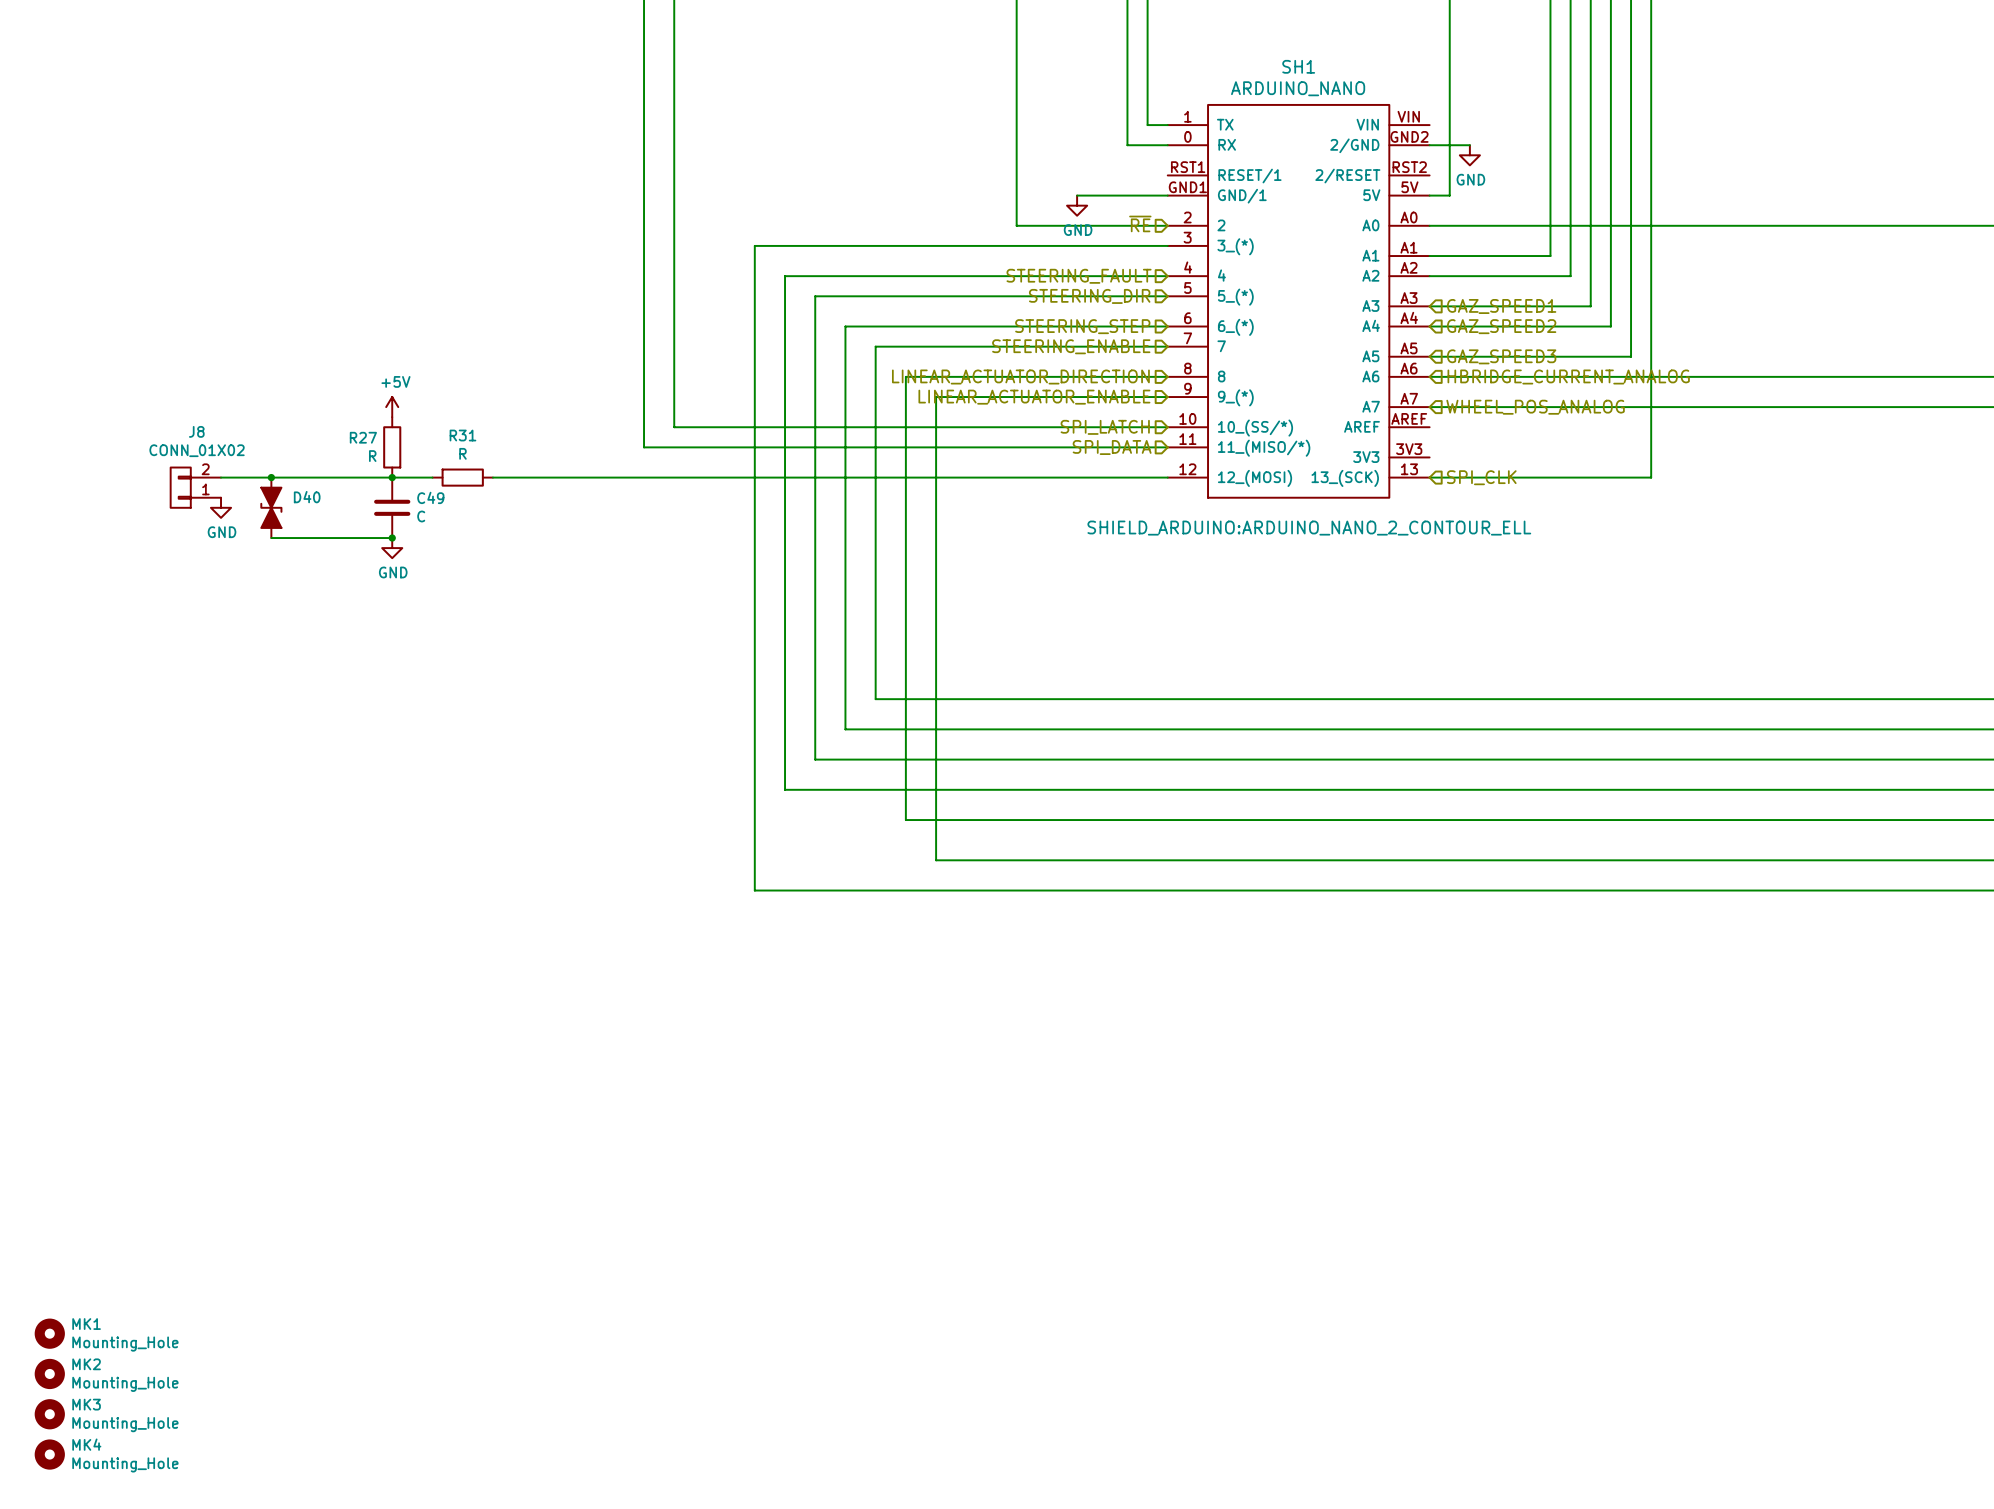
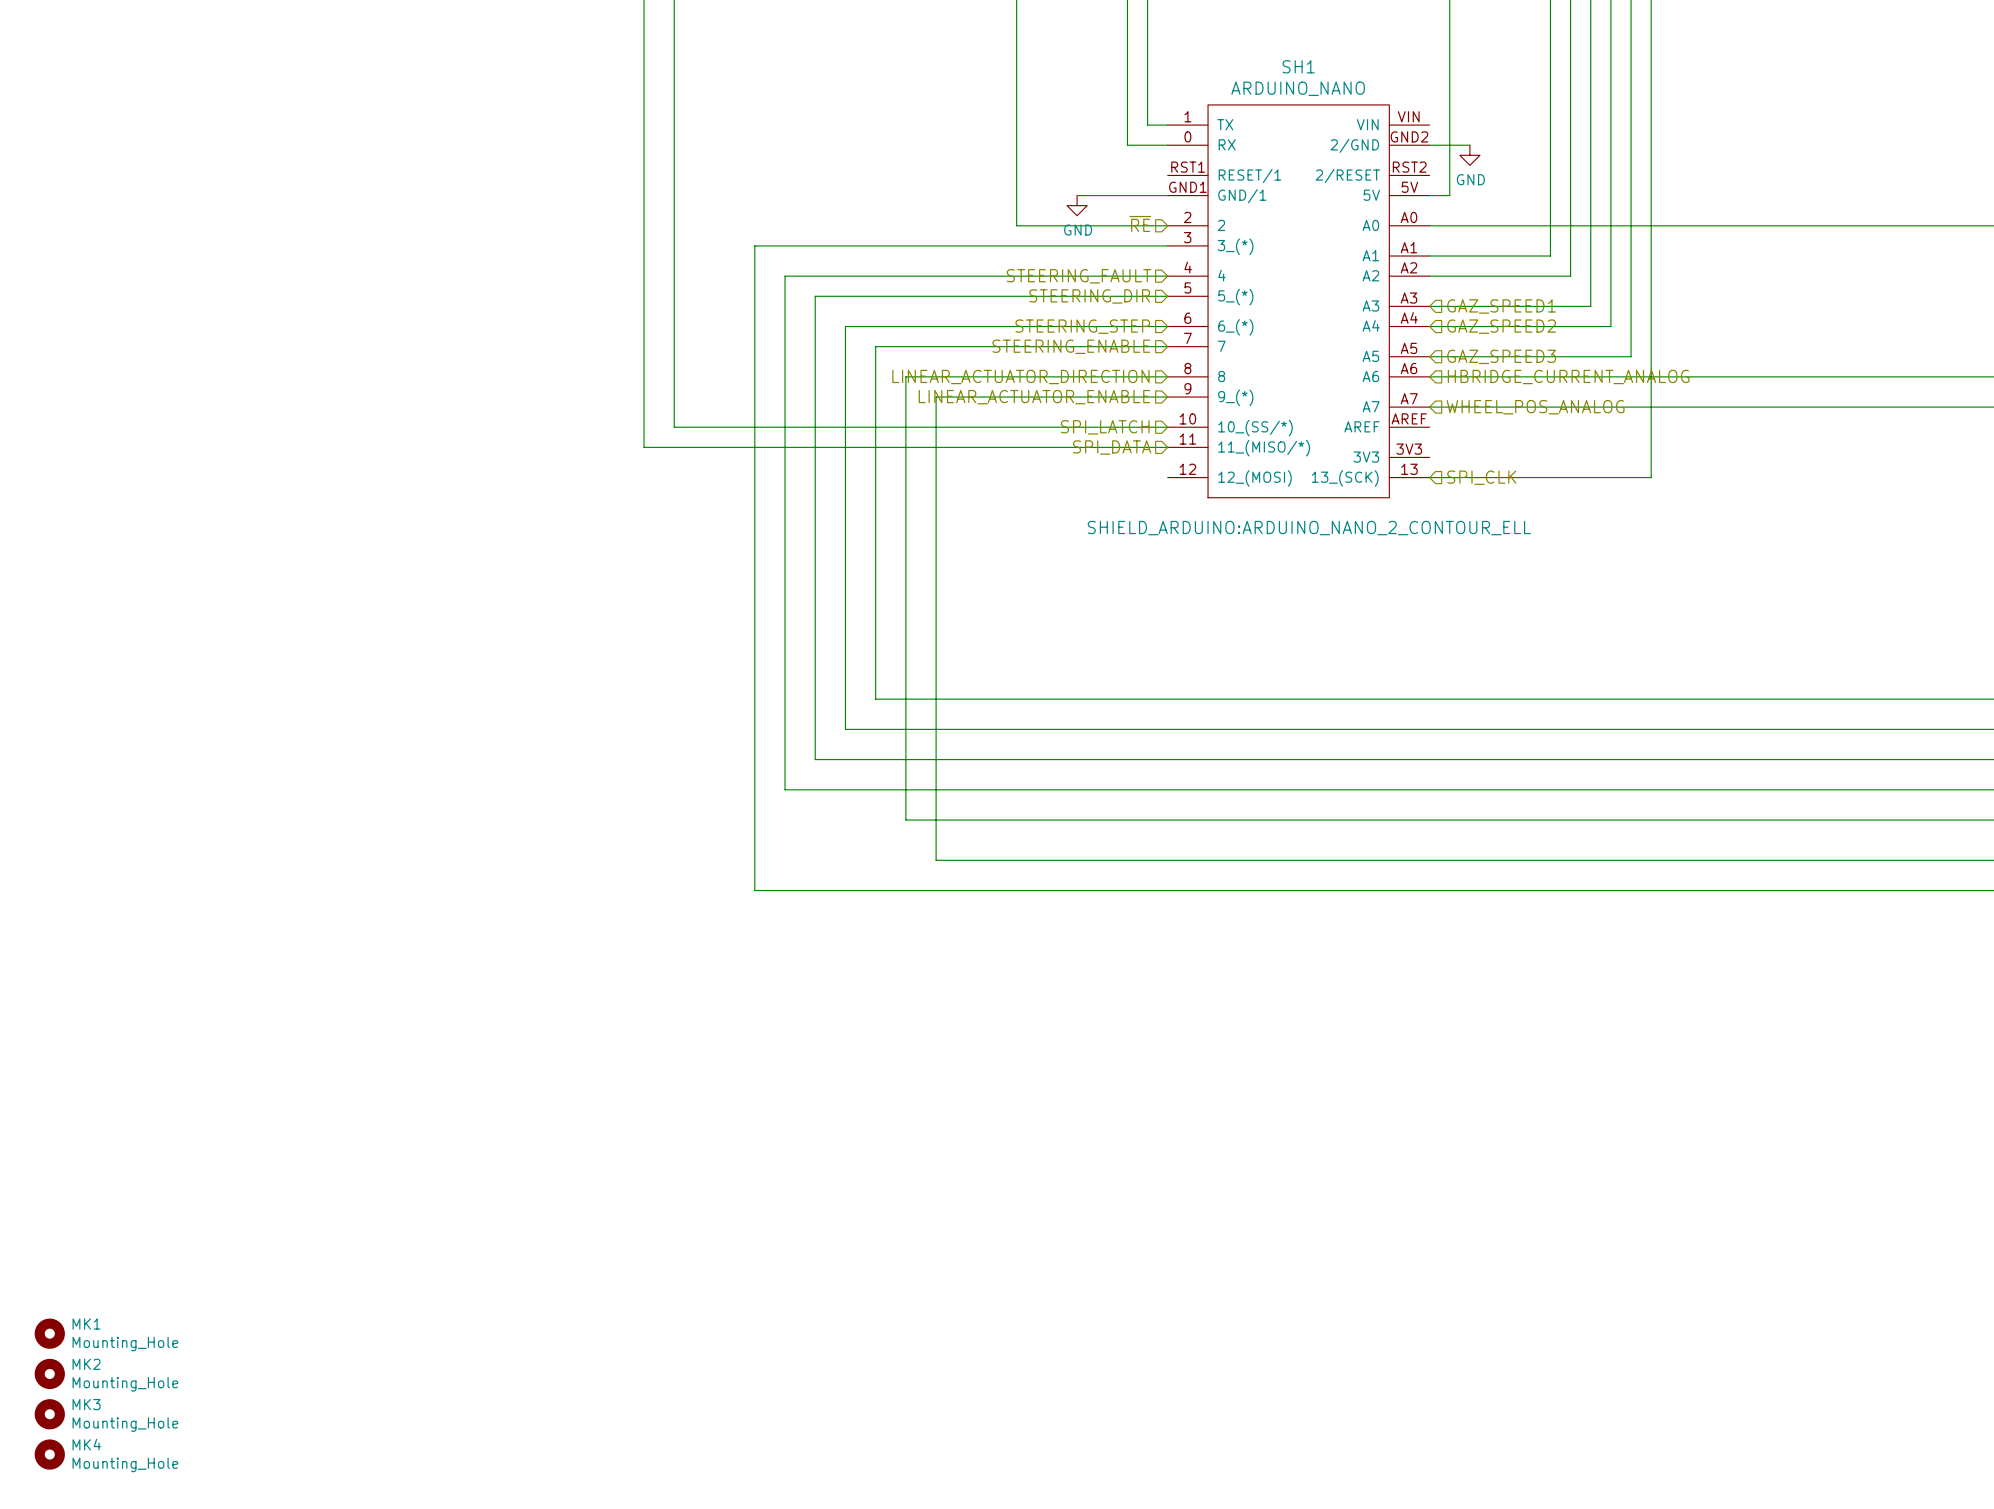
power symbol: +5V (392, 407) -> none
R27: R (392, 447) -> none
wire: (221, 477) (432, 477) -> none
junction: (271, 477) -> none
junction: (392, 477) -> none
R31: R (462, 477) -> none
wire: (492, 477) (1167, 477) -> none
J8: CONN_01X02 (195, 487) -> none
power symbol: GND (221, 507) -> none
D40: (271, 507) -> none
C49: C (392, 507) -> none
wire: (271, 538) (392, 538) -> none
junction: (392, 538) -> none
power symbol: GND (392, 548) -> none

